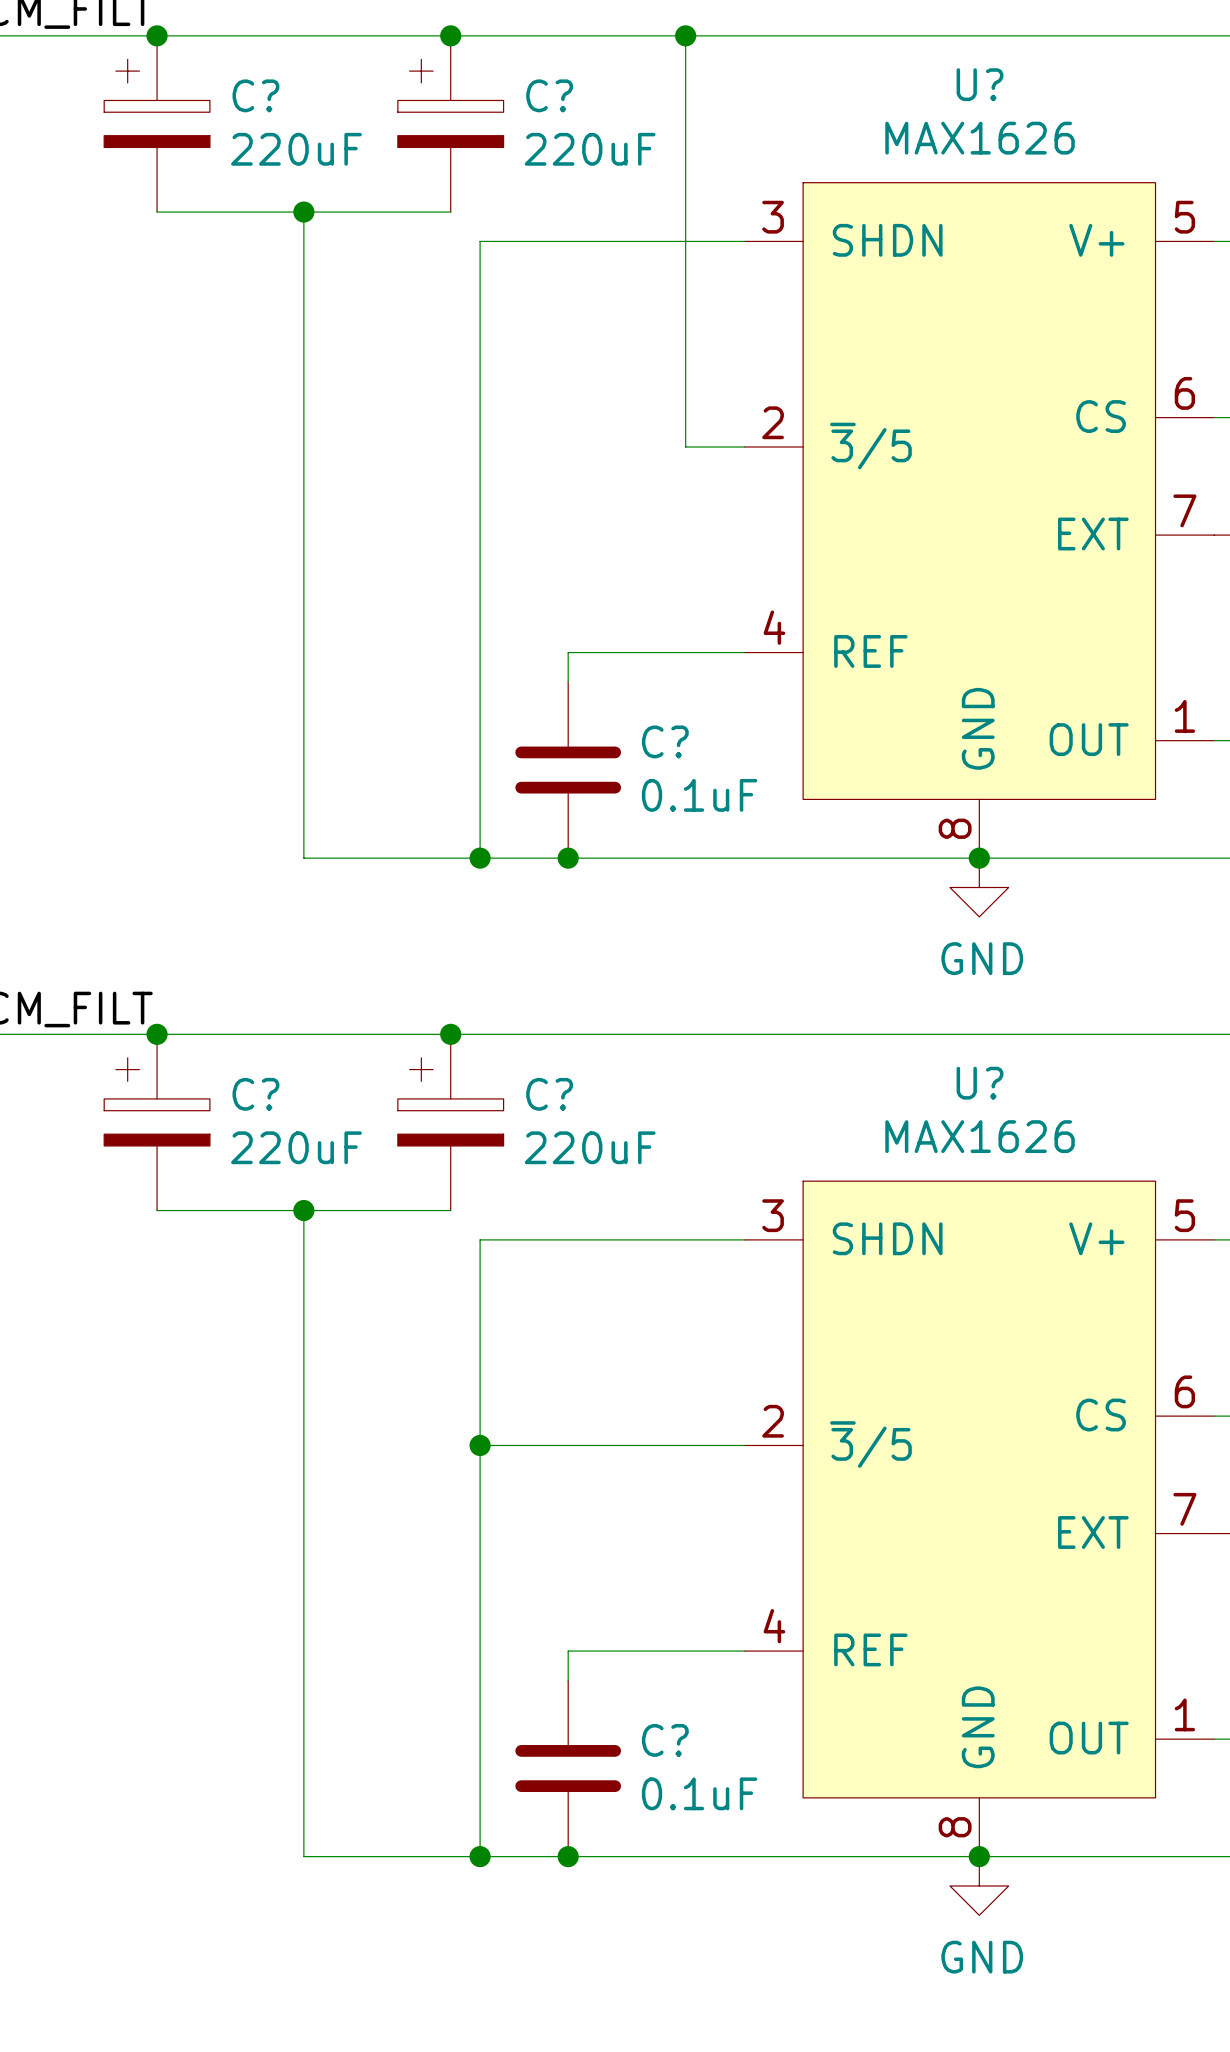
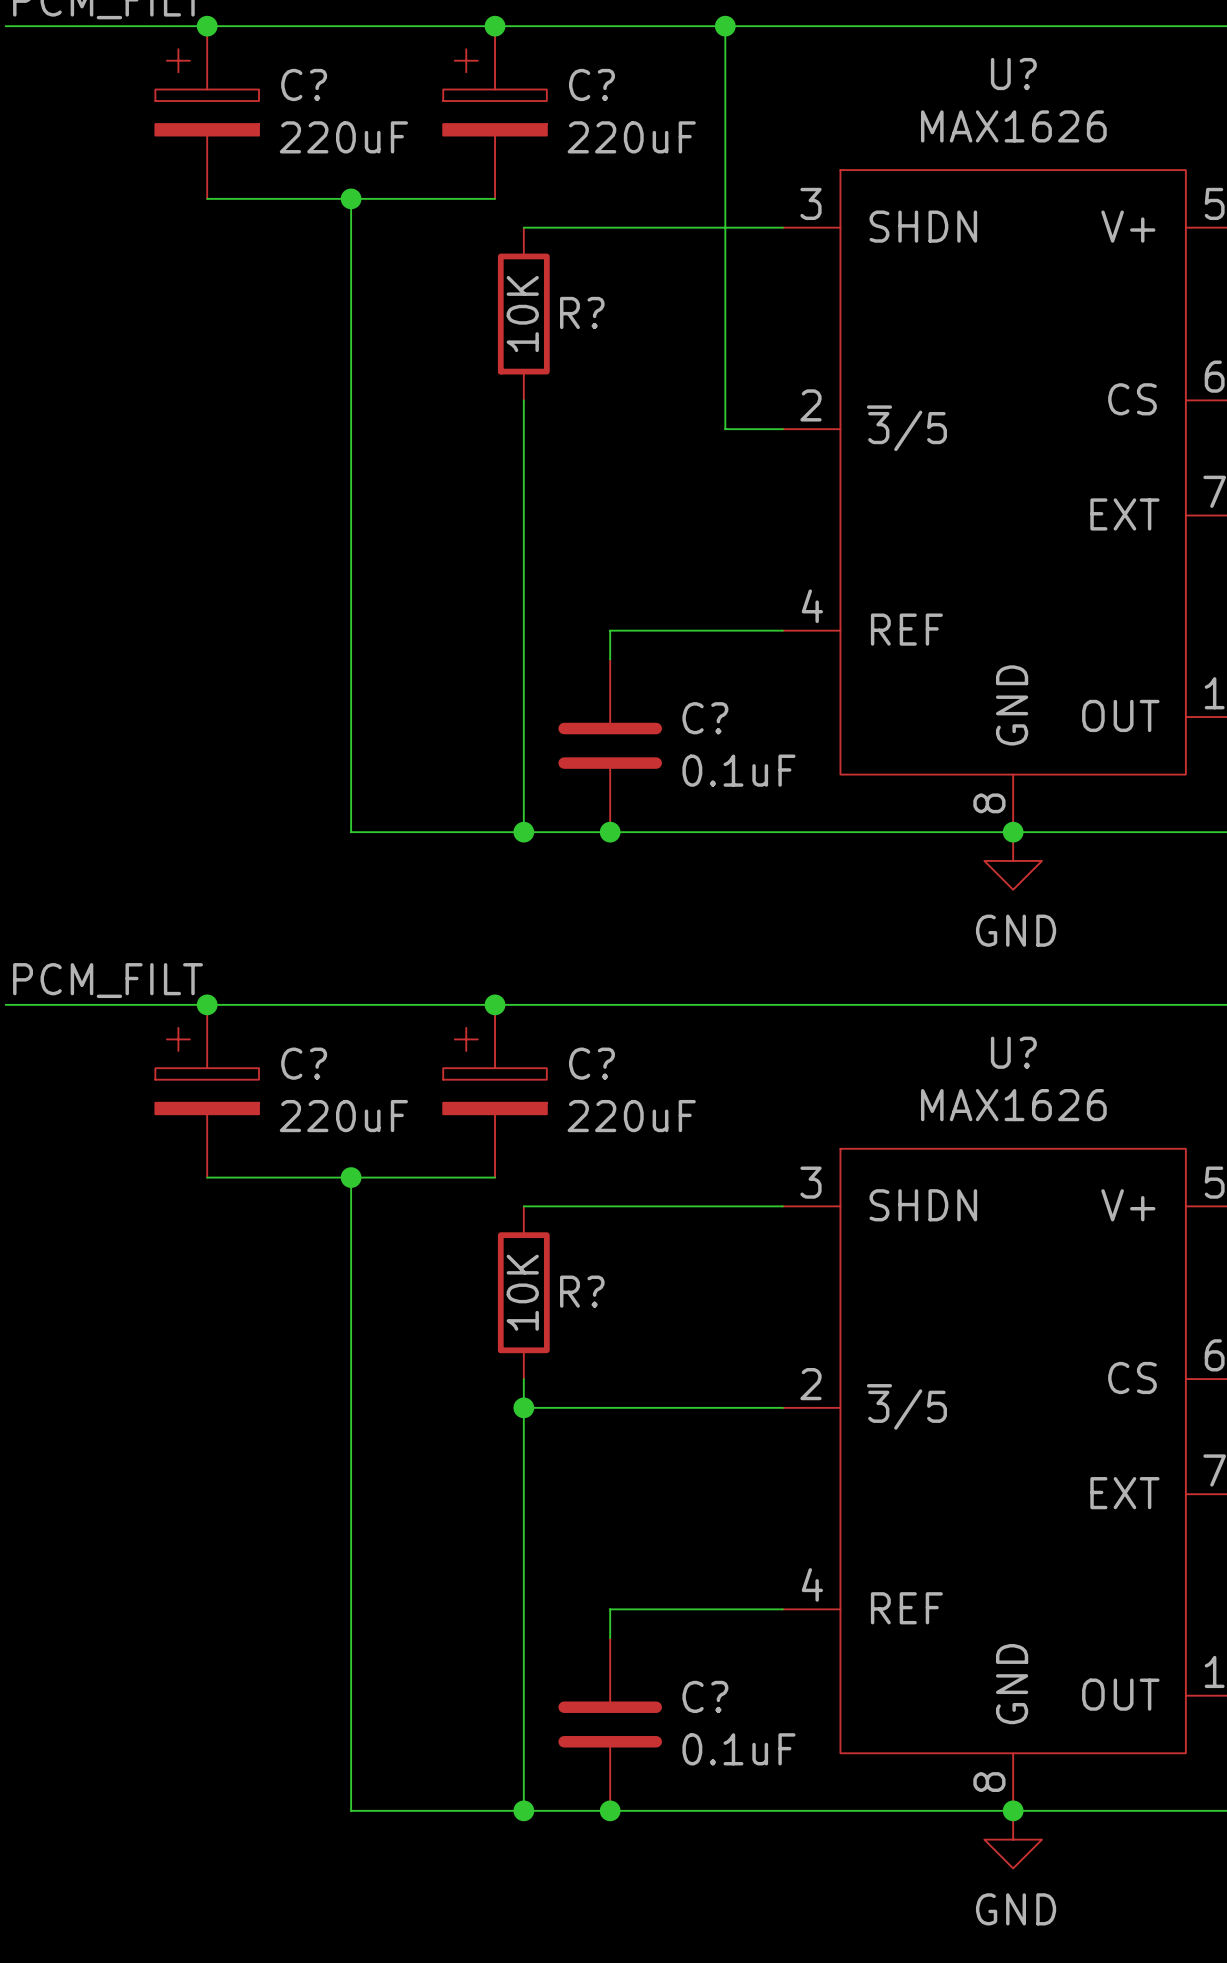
wire: (480, 241) (480, 417) -> none
R?: none -> 10K (523, 314)
wire: (480, 1239) (480, 1416) -> none
R?: none -> 10K (523, 1292)

